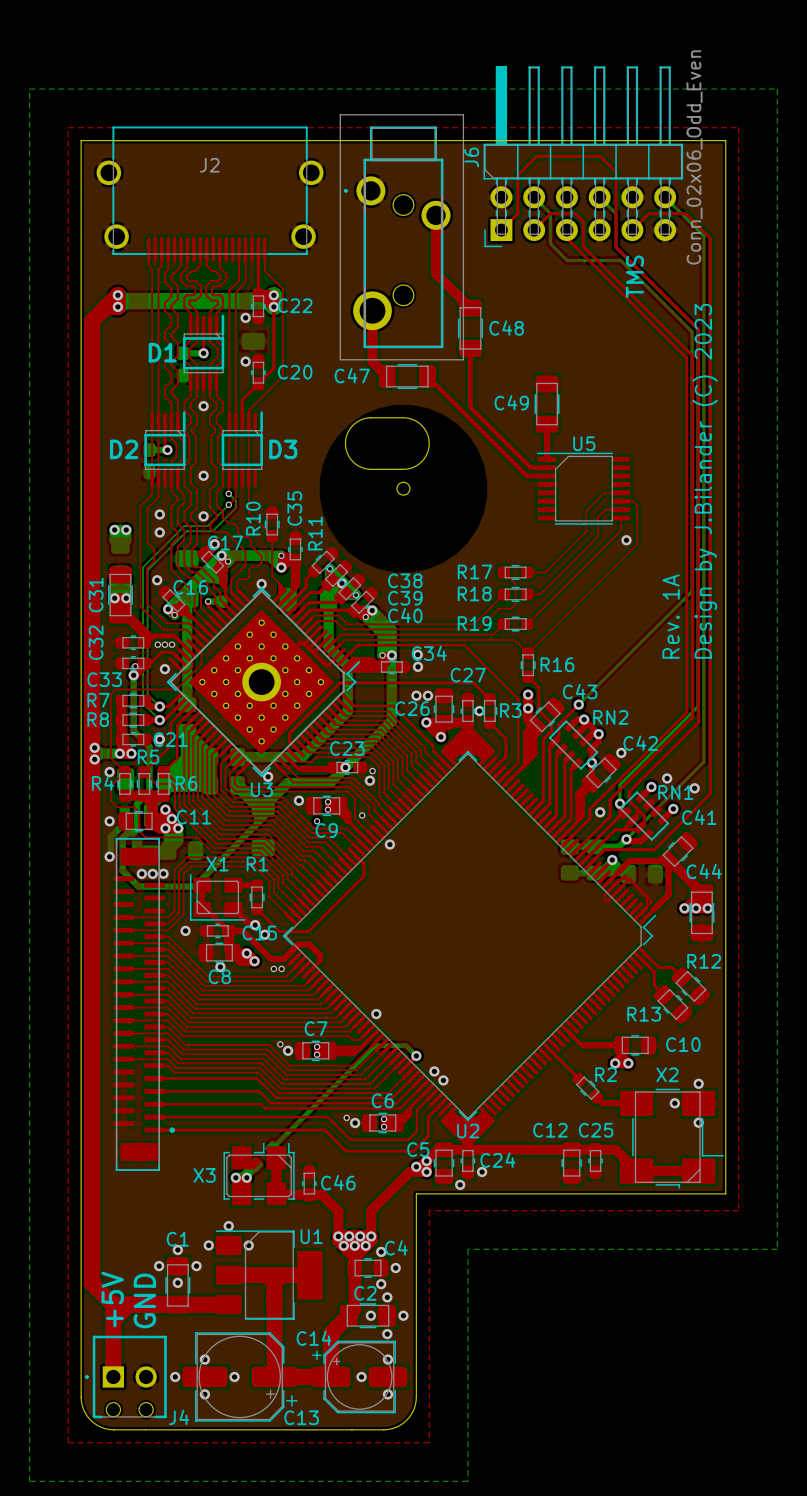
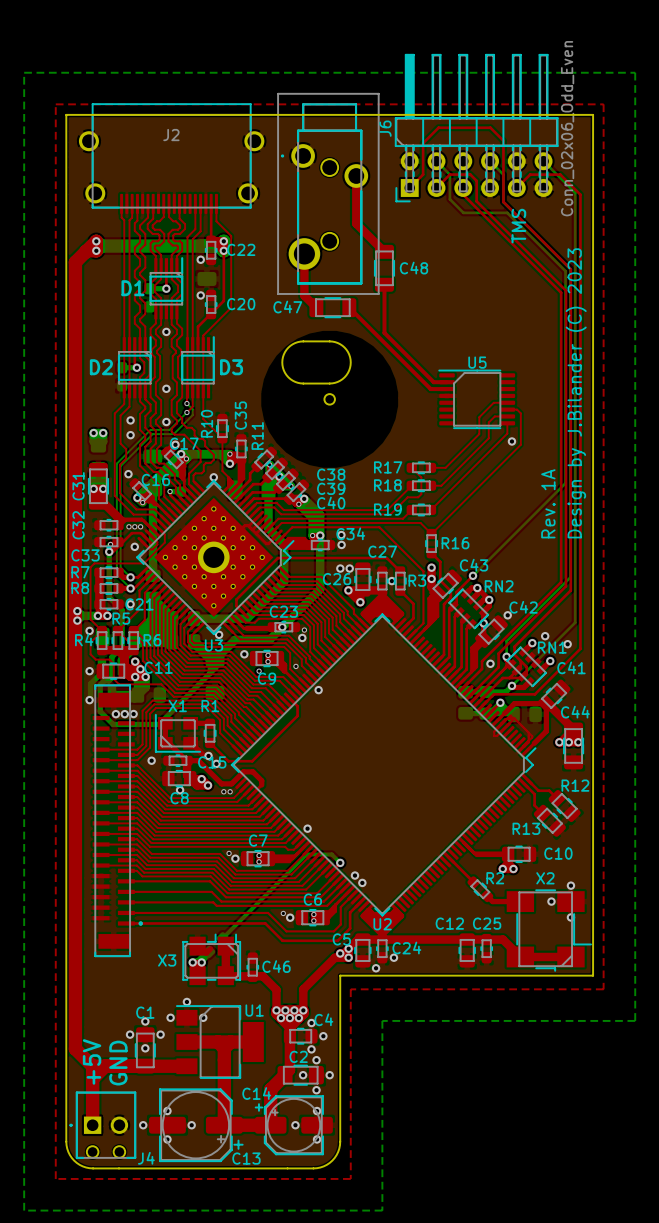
C49: (547, 404) -> none
top track: (547, 424) (547, 459) -> none

